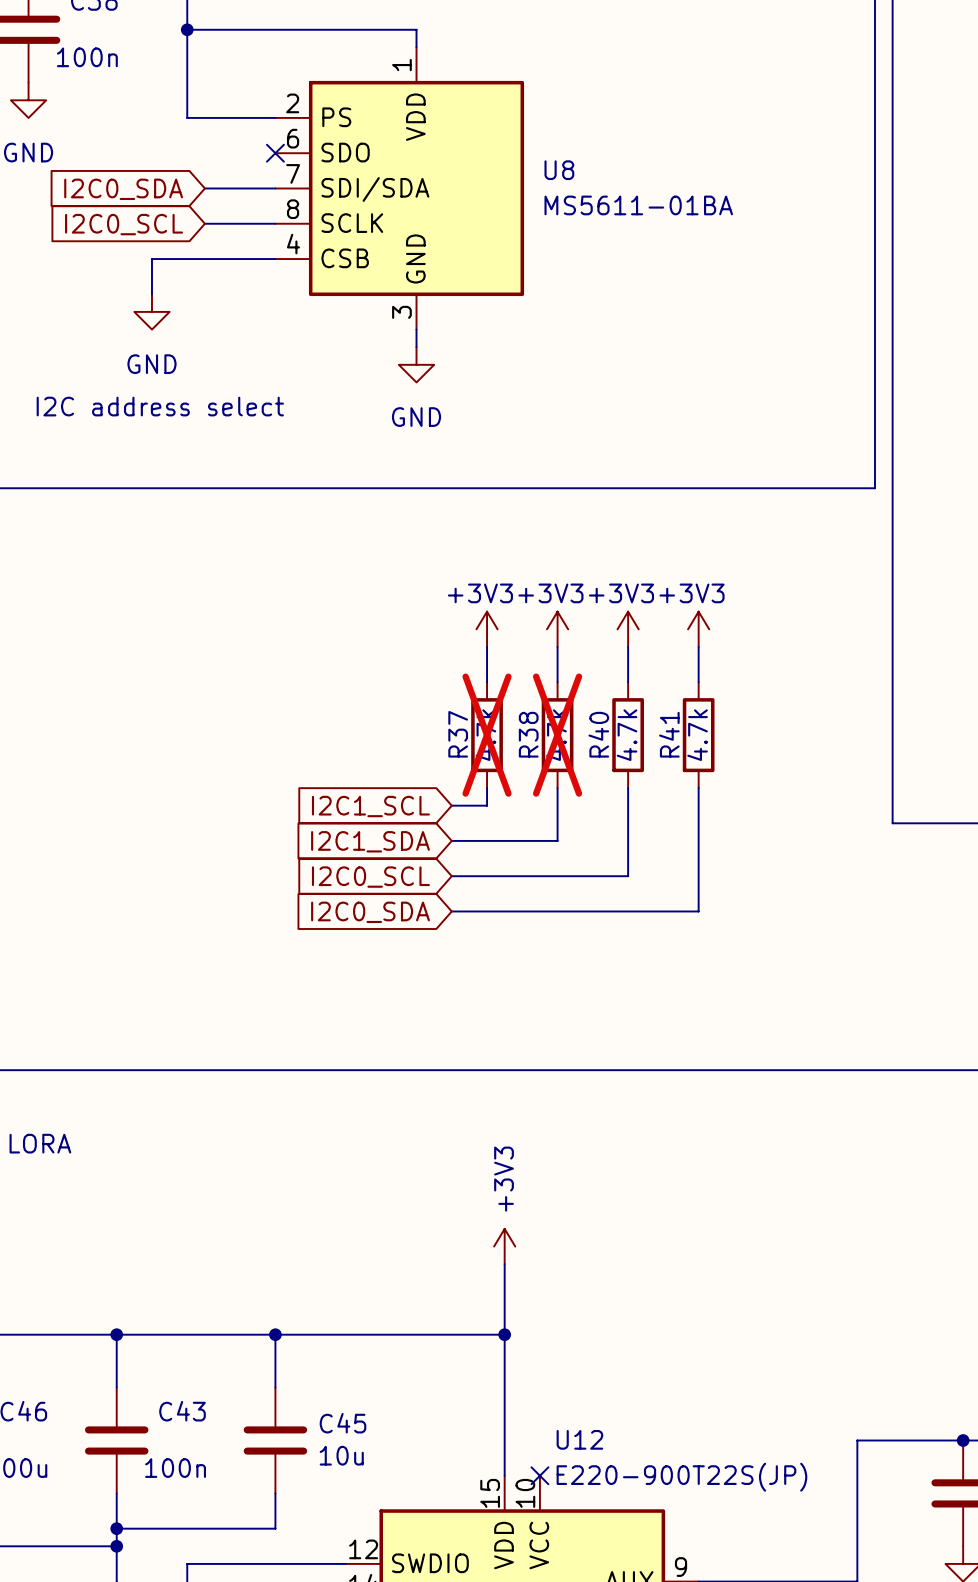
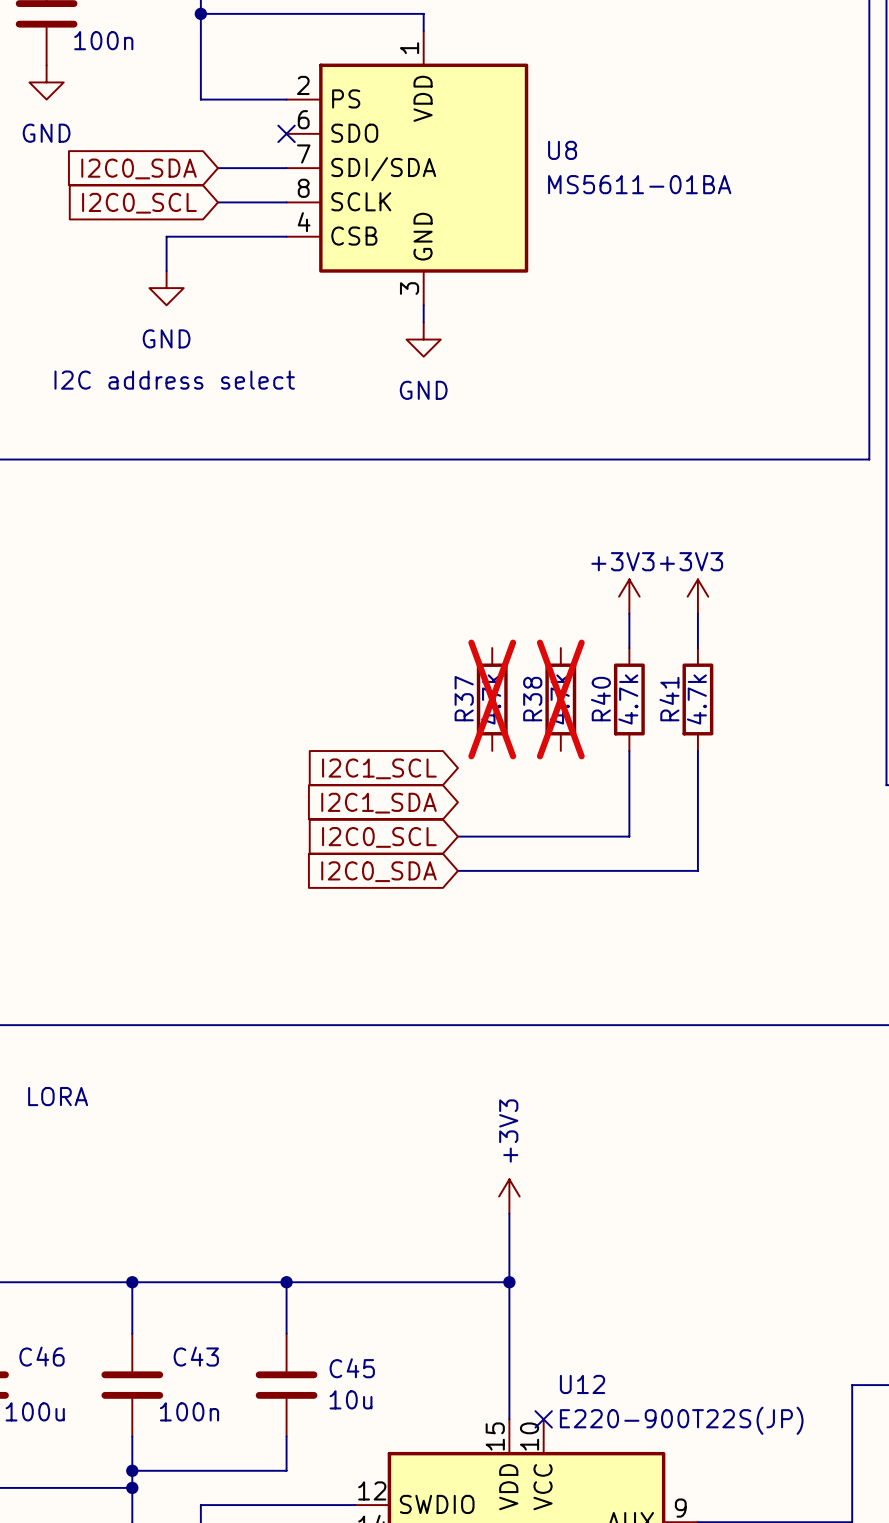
power symbol: +3V3 (487, 629) -> none
power symbol: +3V3 (557, 629) -> none
wire: (487, 646) (487, 682) -> none
wire: (557, 646) (557, 682) -> none
wire: (487, 788) (487, 805) (451, 805) -> none
wire: (557, 788) (557, 840) (451, 840) -> none

